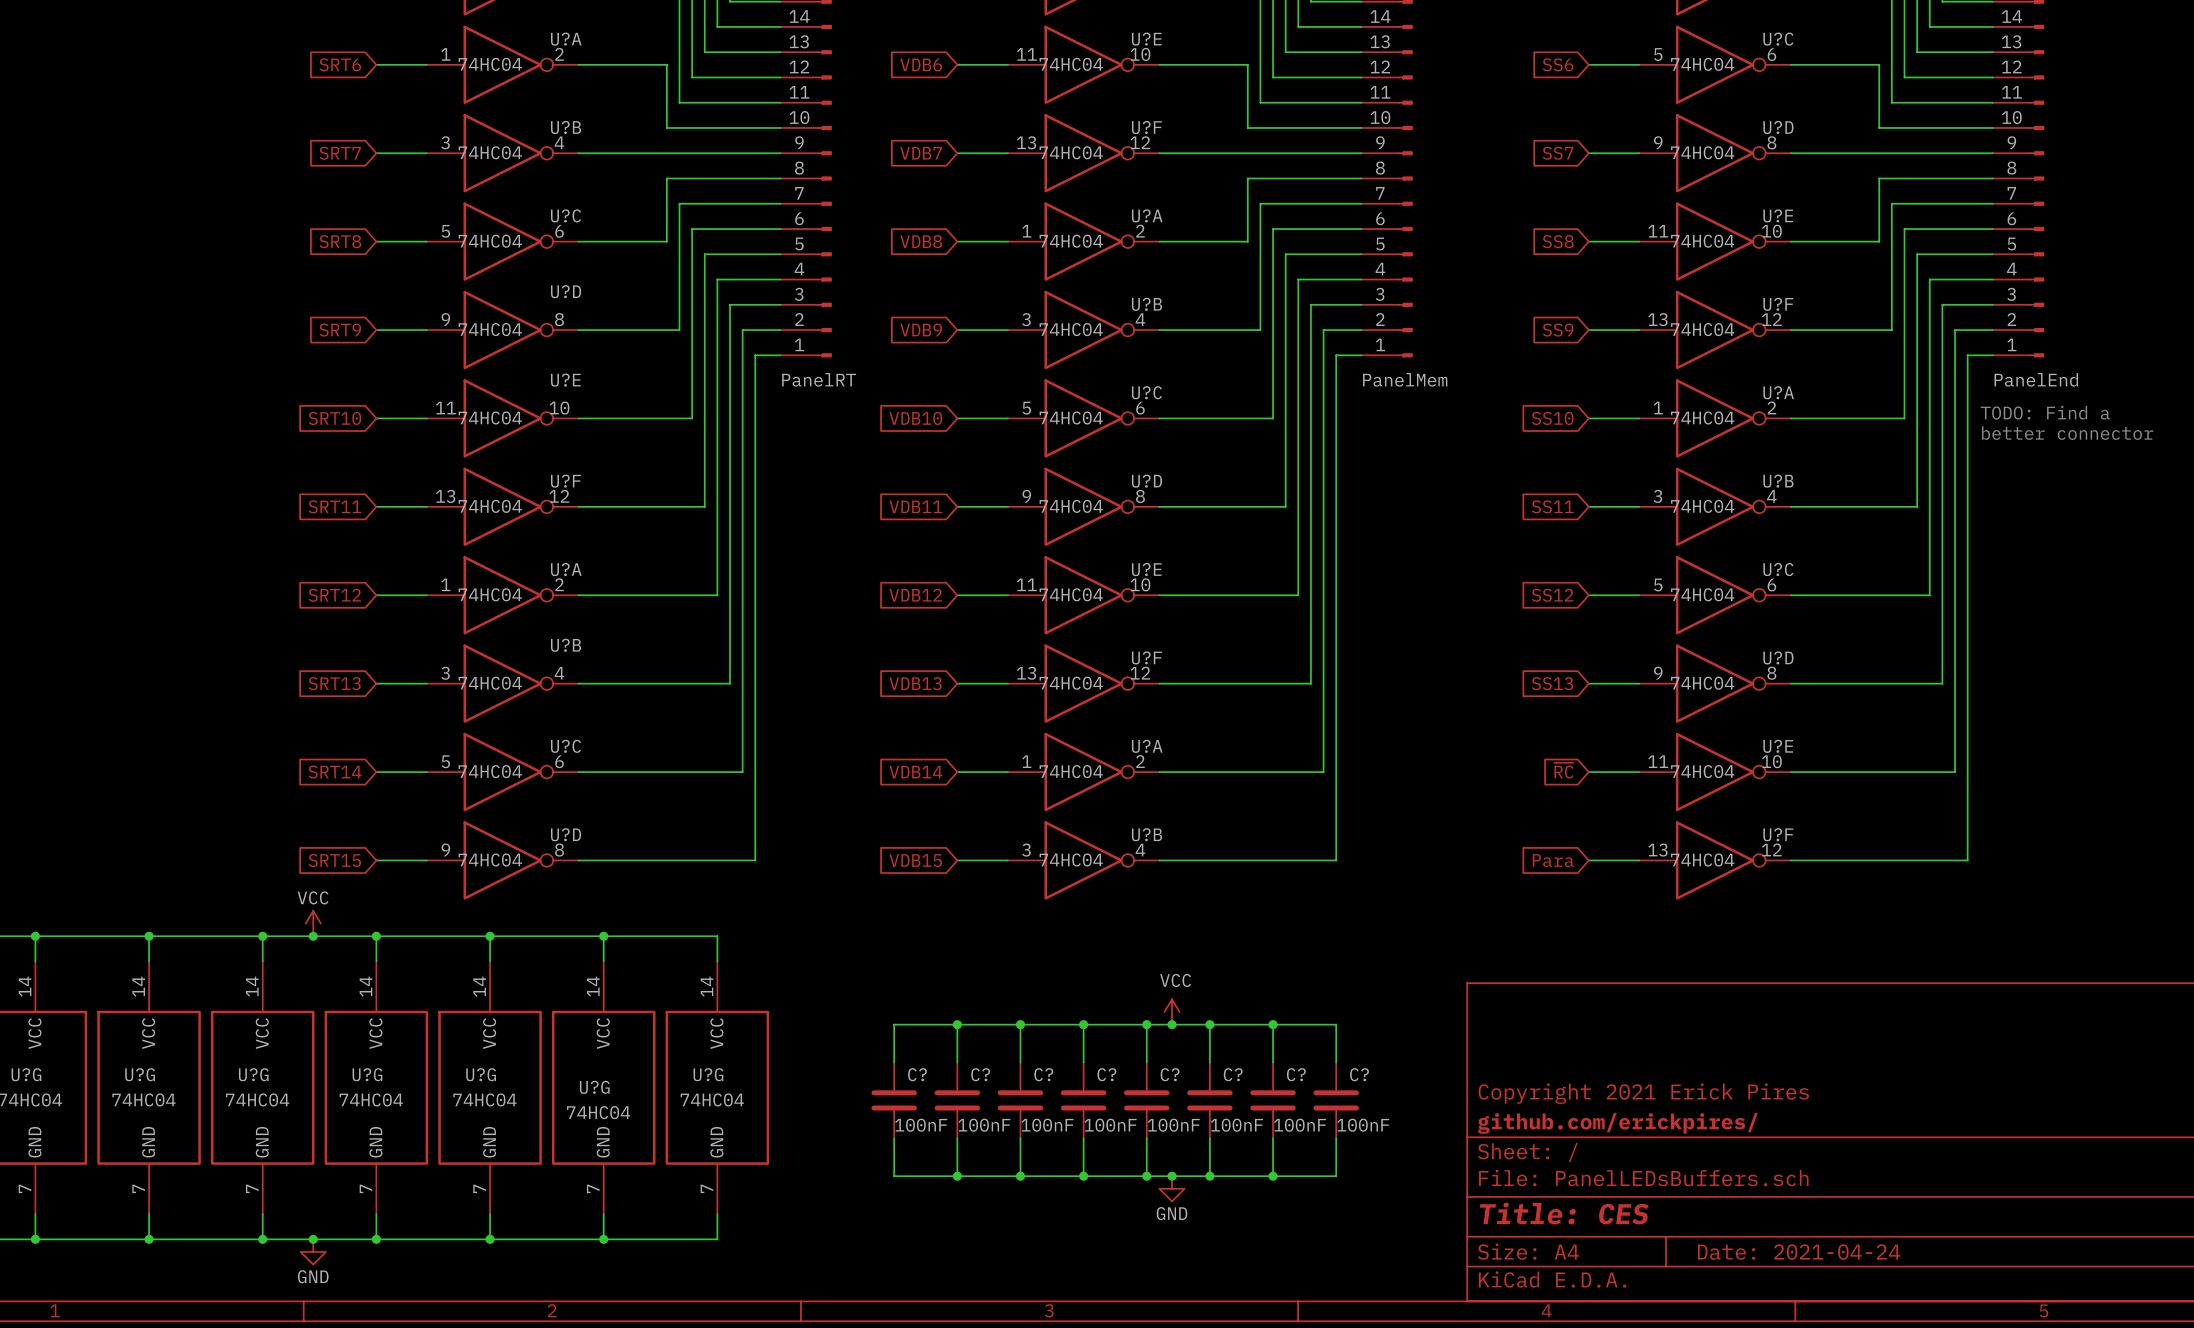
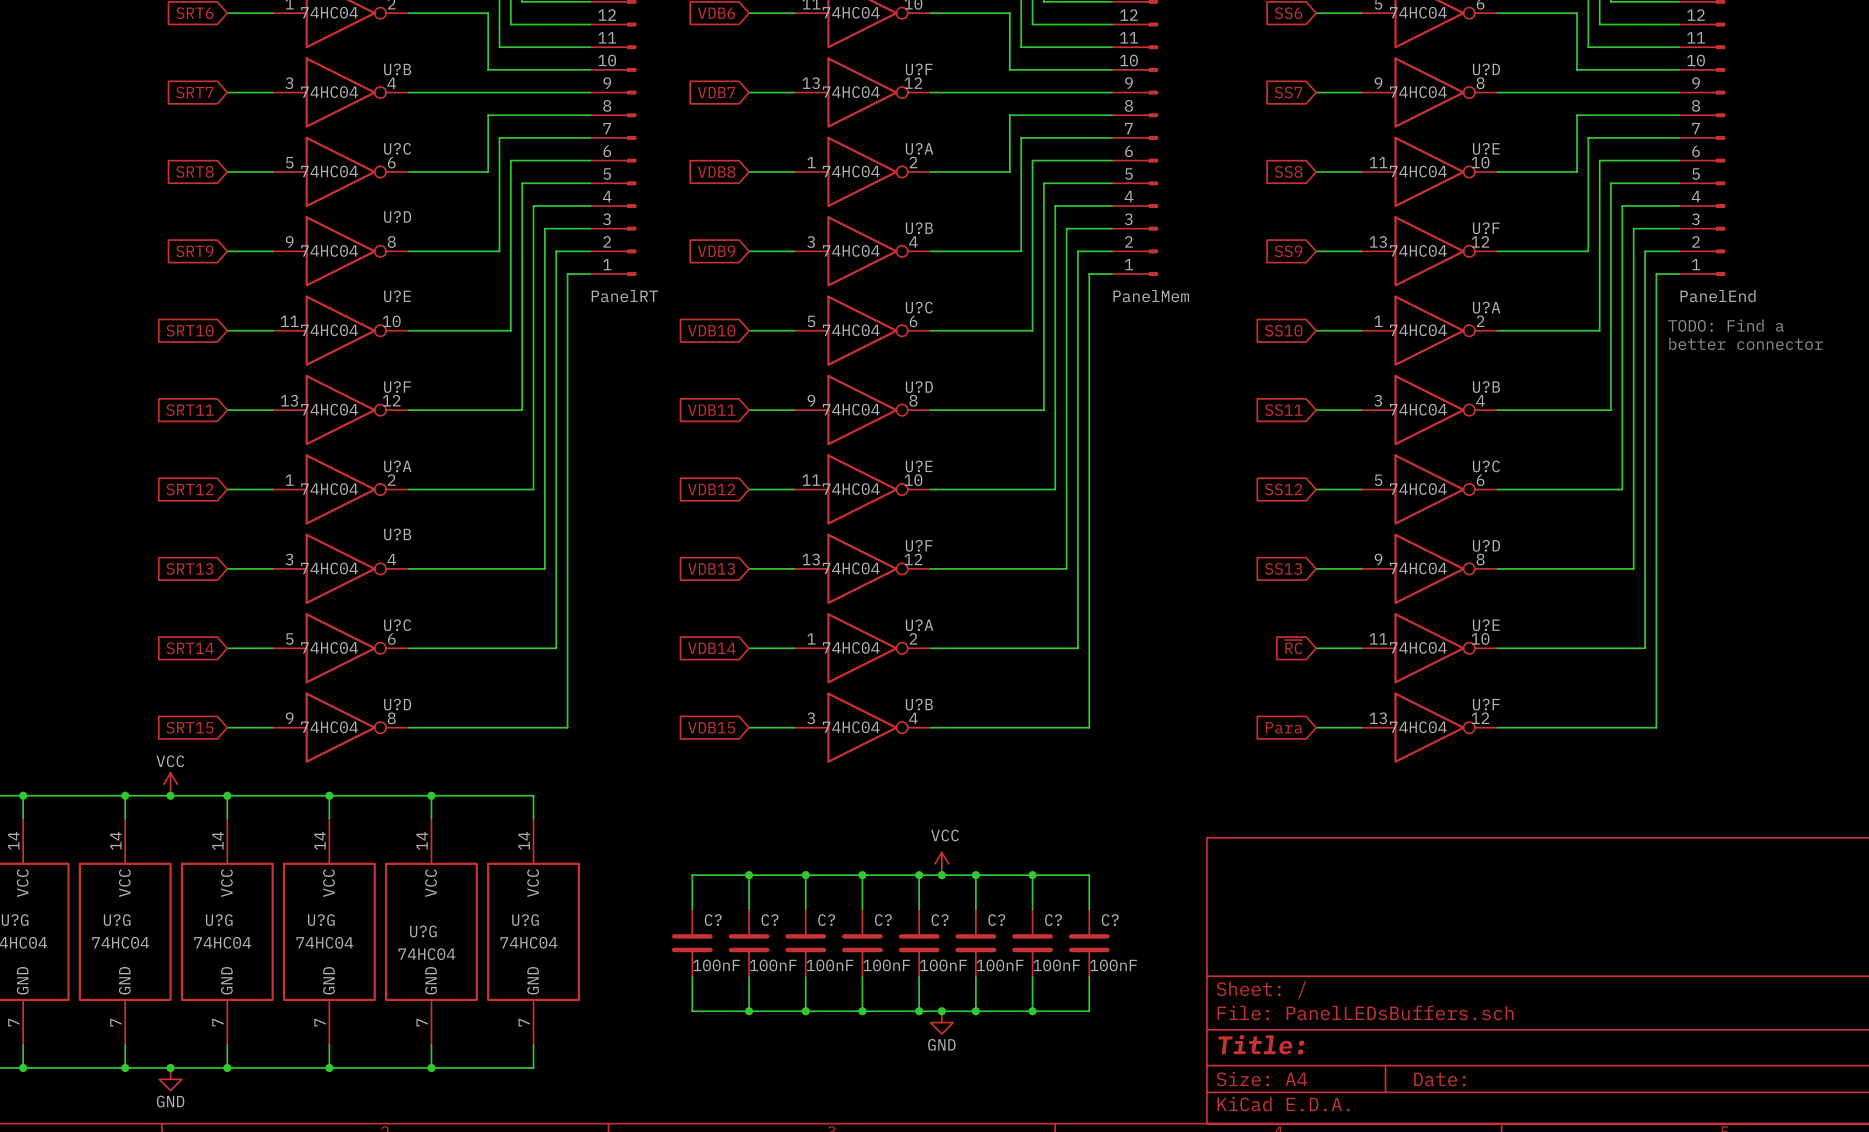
title block: Copyright 2021 Erick Pires (1643, 1093) -> none
title block: github.com/erickpires/ (1617, 1123) -> none
title block: Title: CES (1564, 1213) -> Title: (1261, 1044)
title block: Date: 2021-04-24 (1799, 1252) -> Date: (1439, 1079)

